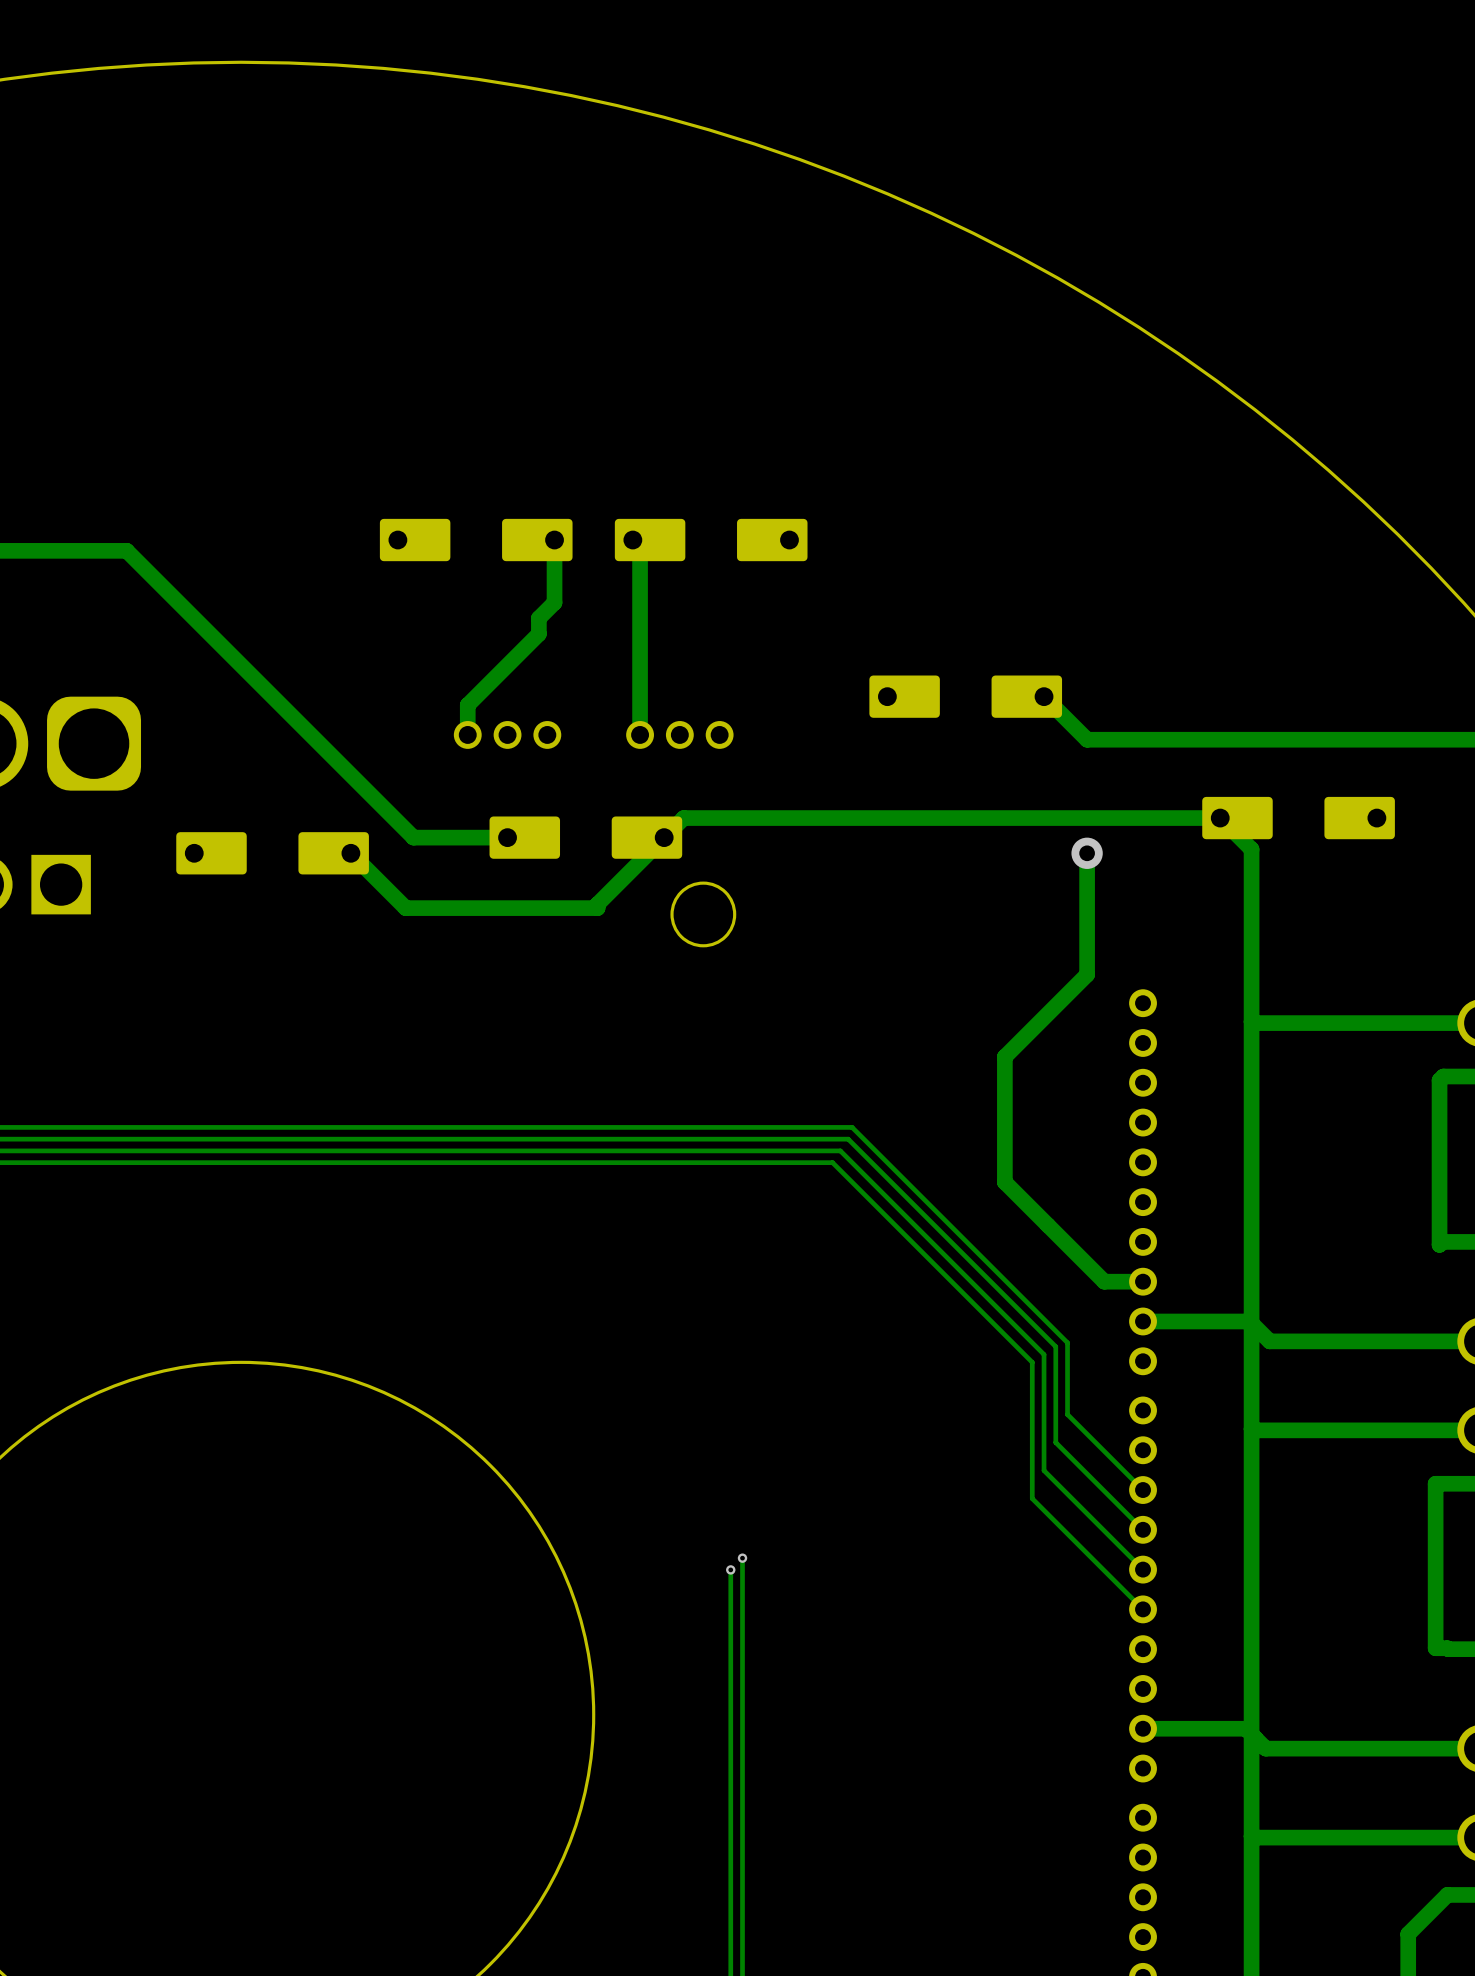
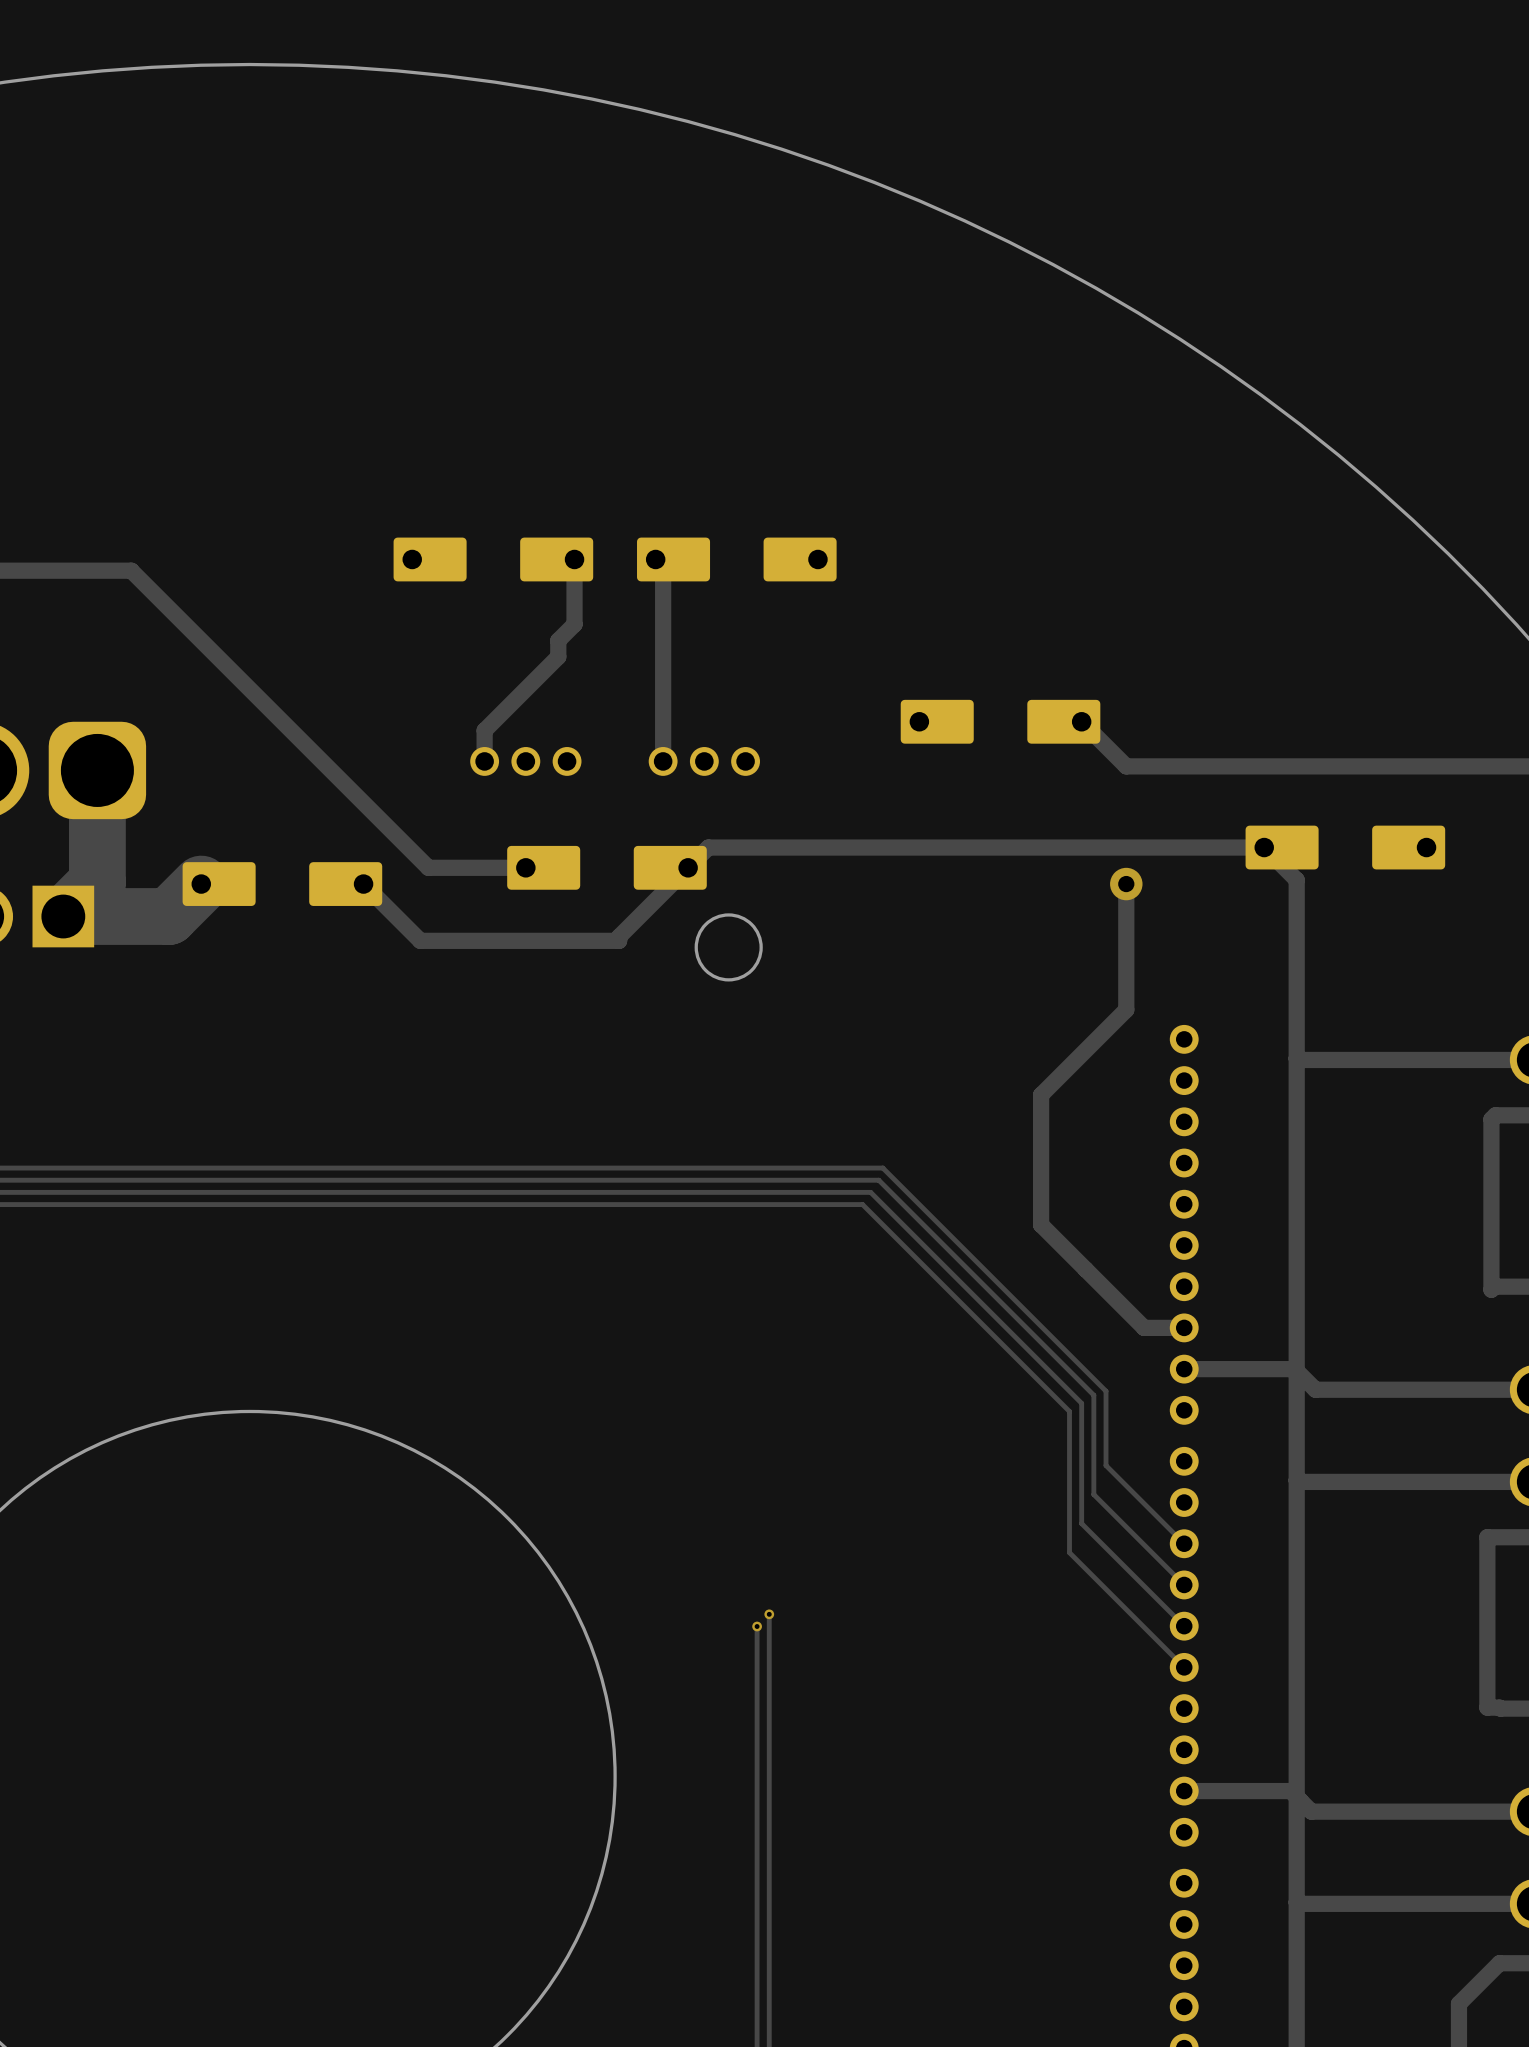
track: none -> (97, 770) (97, 882) (63, 916) (168, 916) (201, 884)

